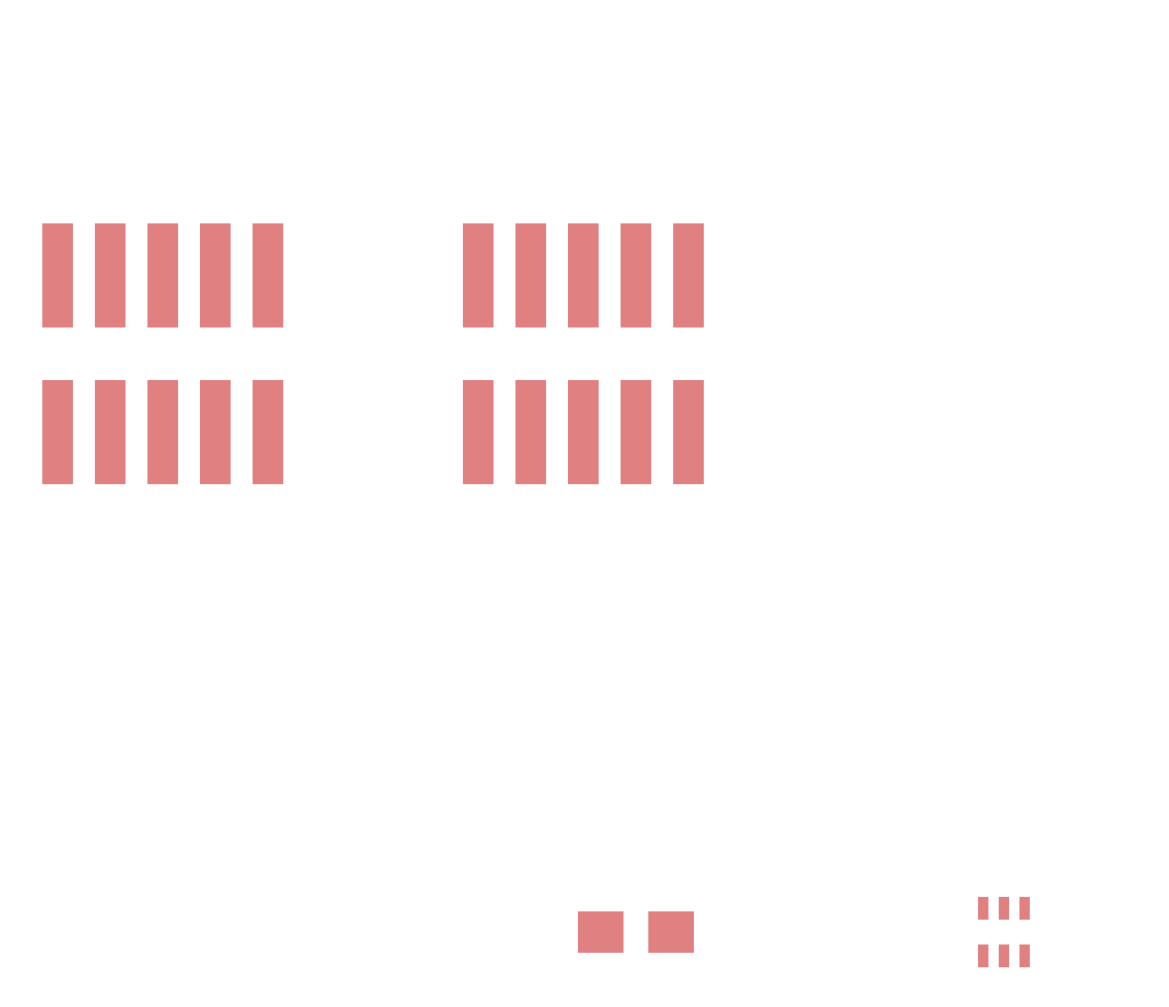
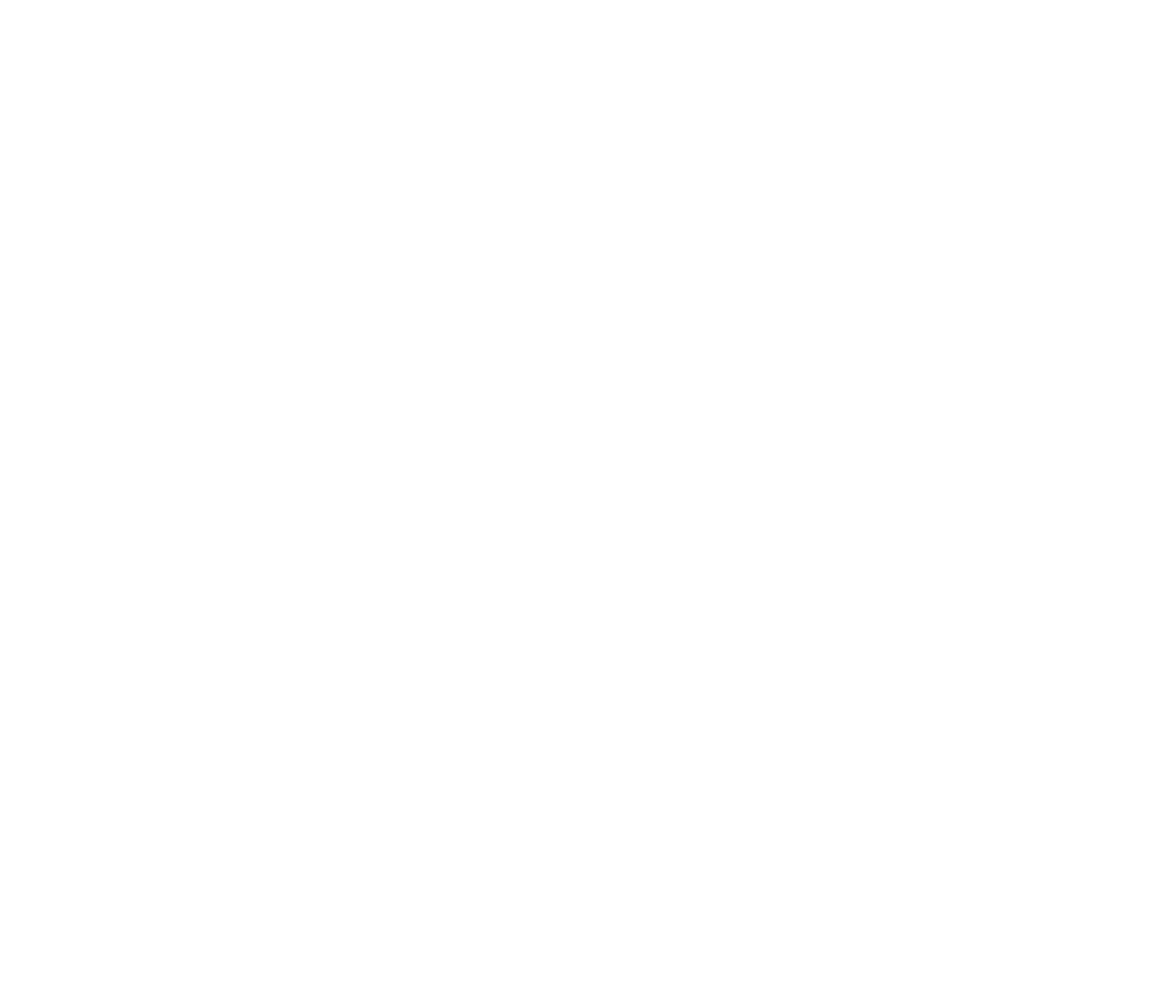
part: (162, 353) -> none
part: (583, 353) -> none
part: (635, 932) -> none
part: (1003, 932) -> none

